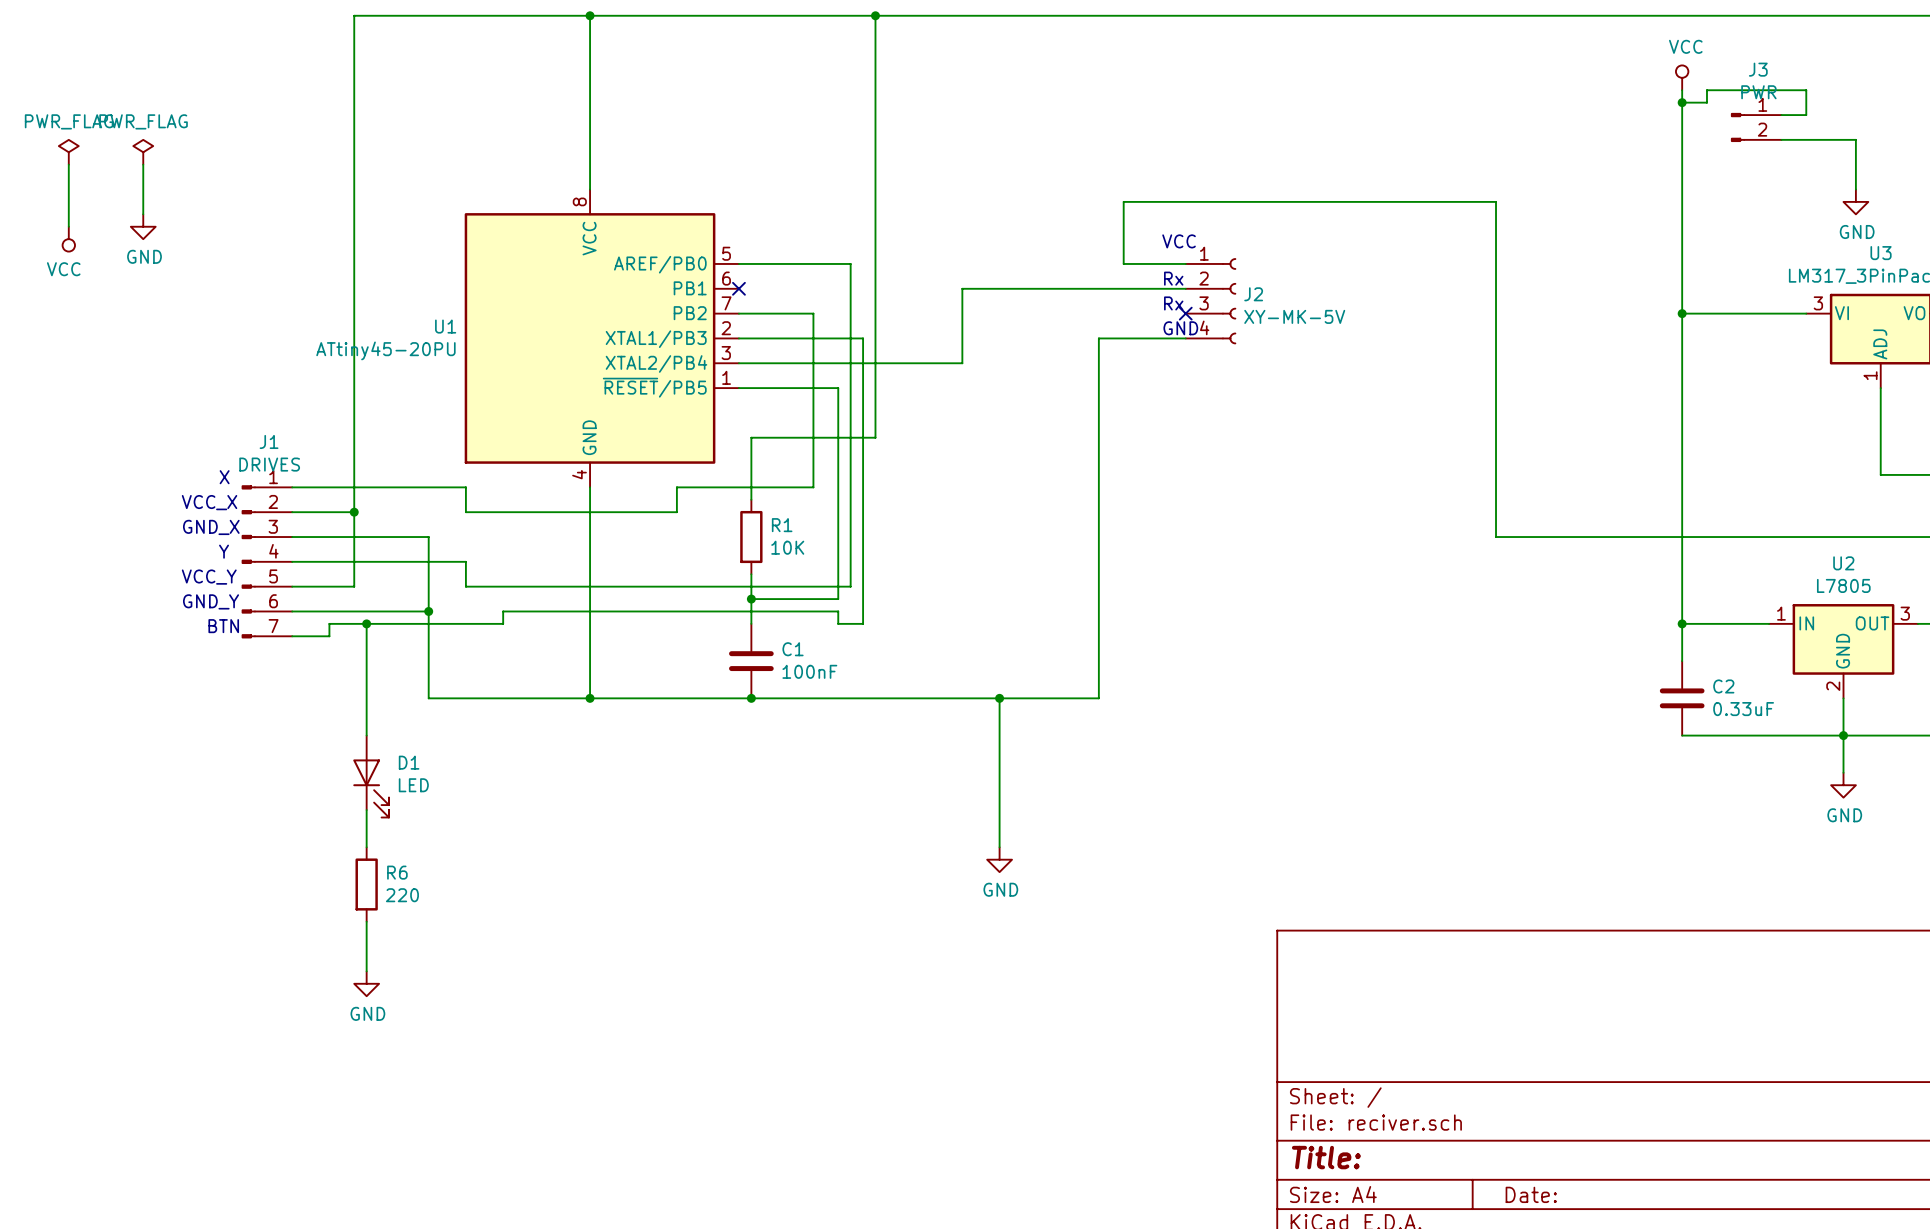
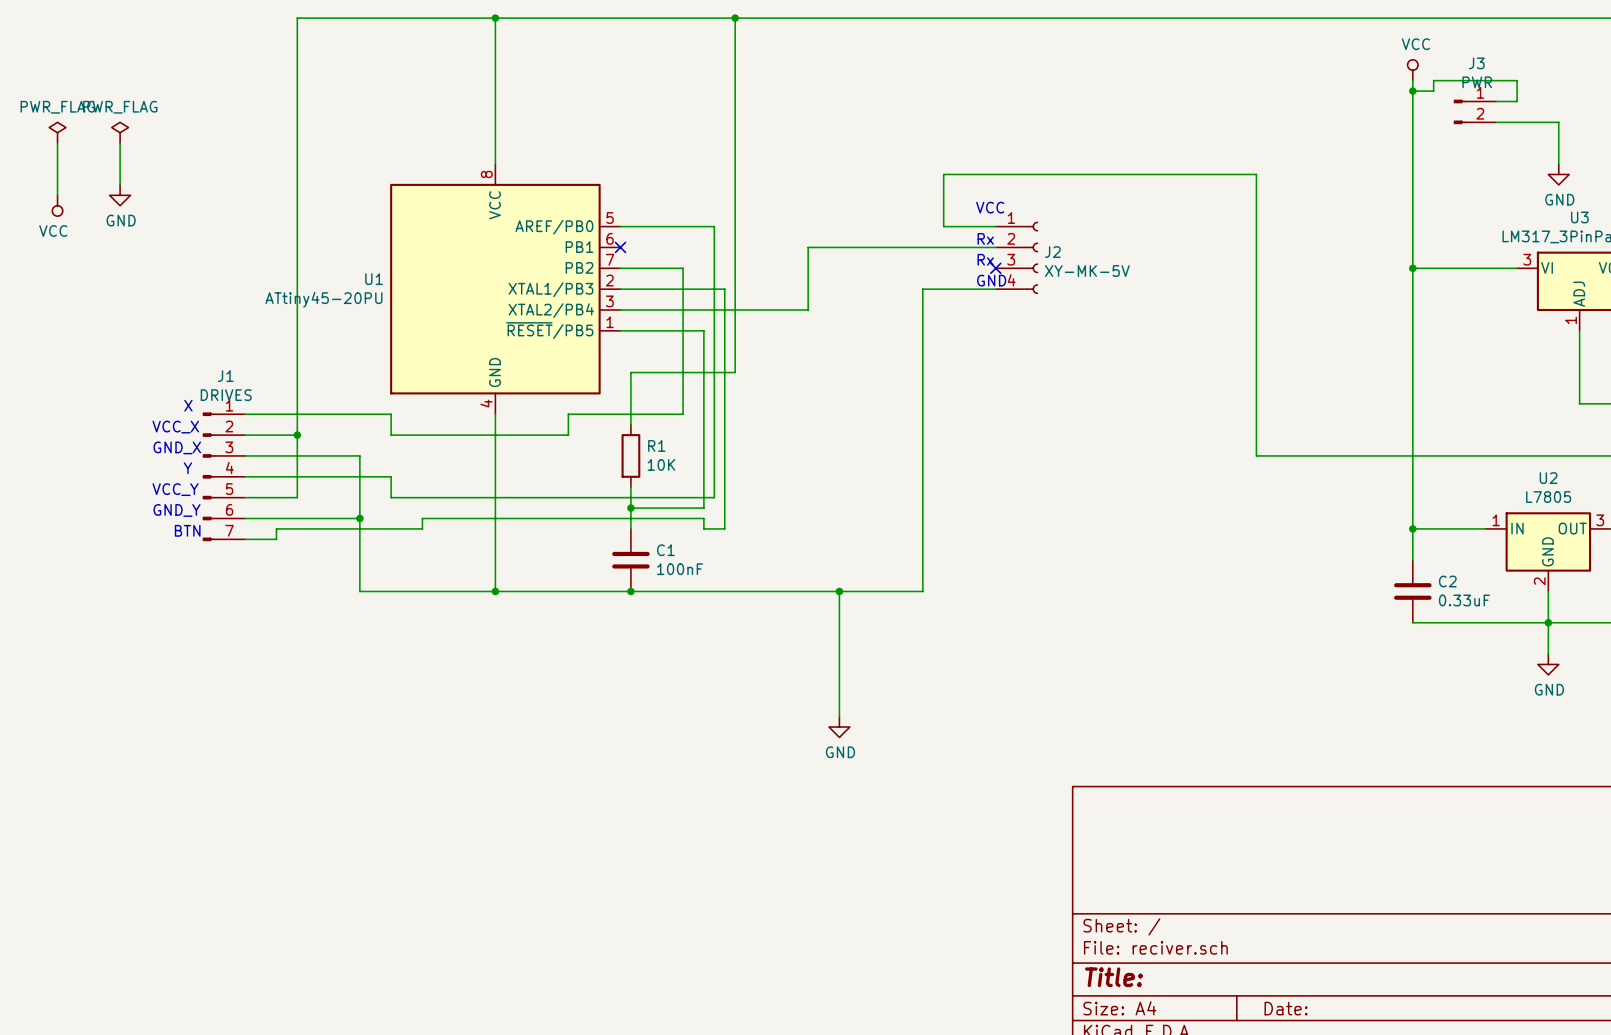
wire: (366, 623) (366, 735) -> none
junction: (366, 623) -> none
D1: LED (371, 776) -> none
wire: (366, 810) (366, 847) -> none
R6: 220 (366, 884) -> none
wire: (366, 921) (366, 971) -> none
power symbol: GND (366, 983) -> none

